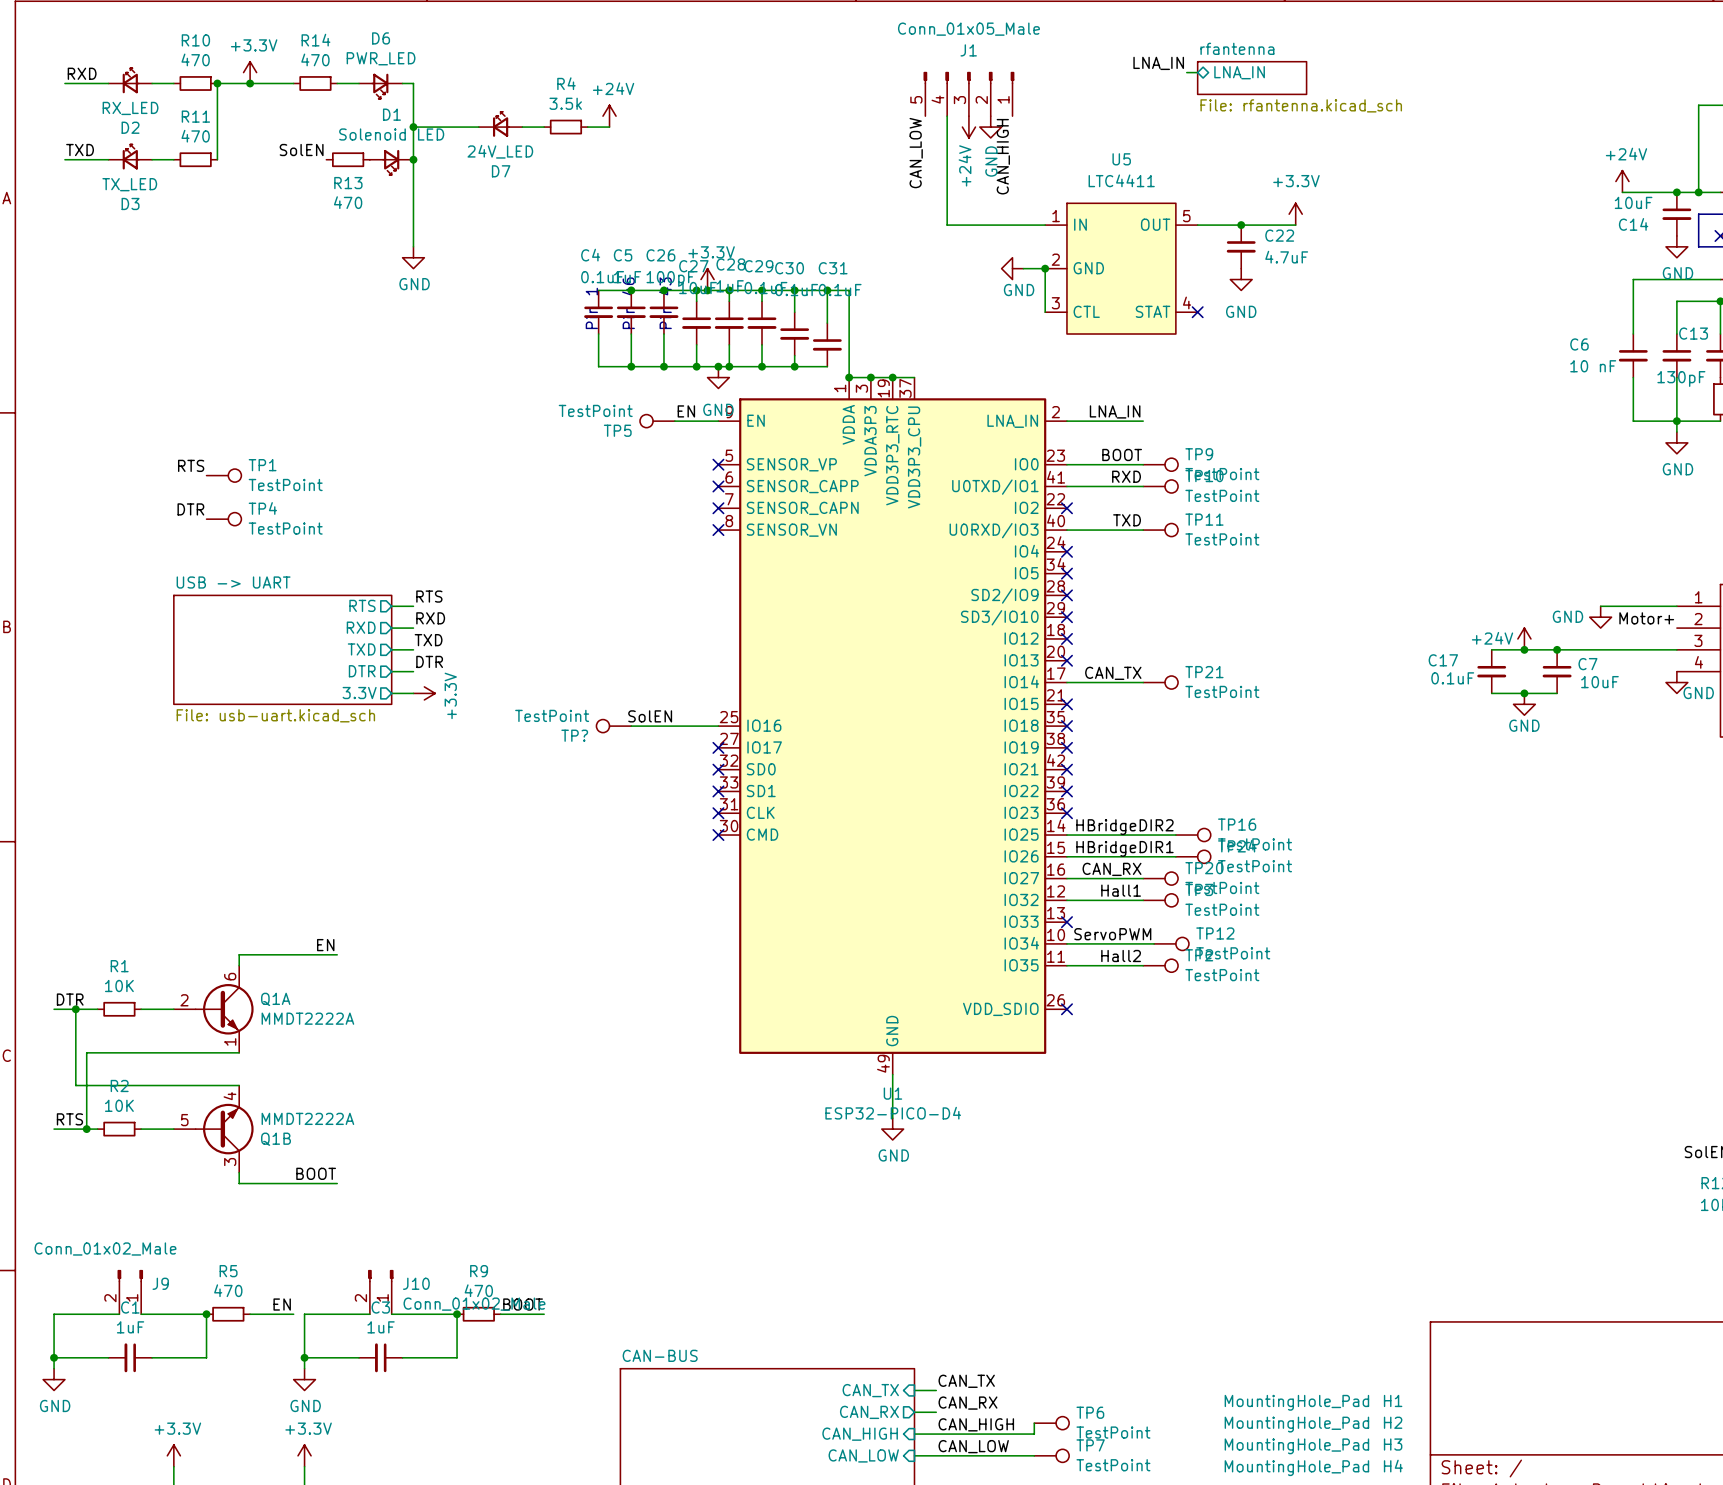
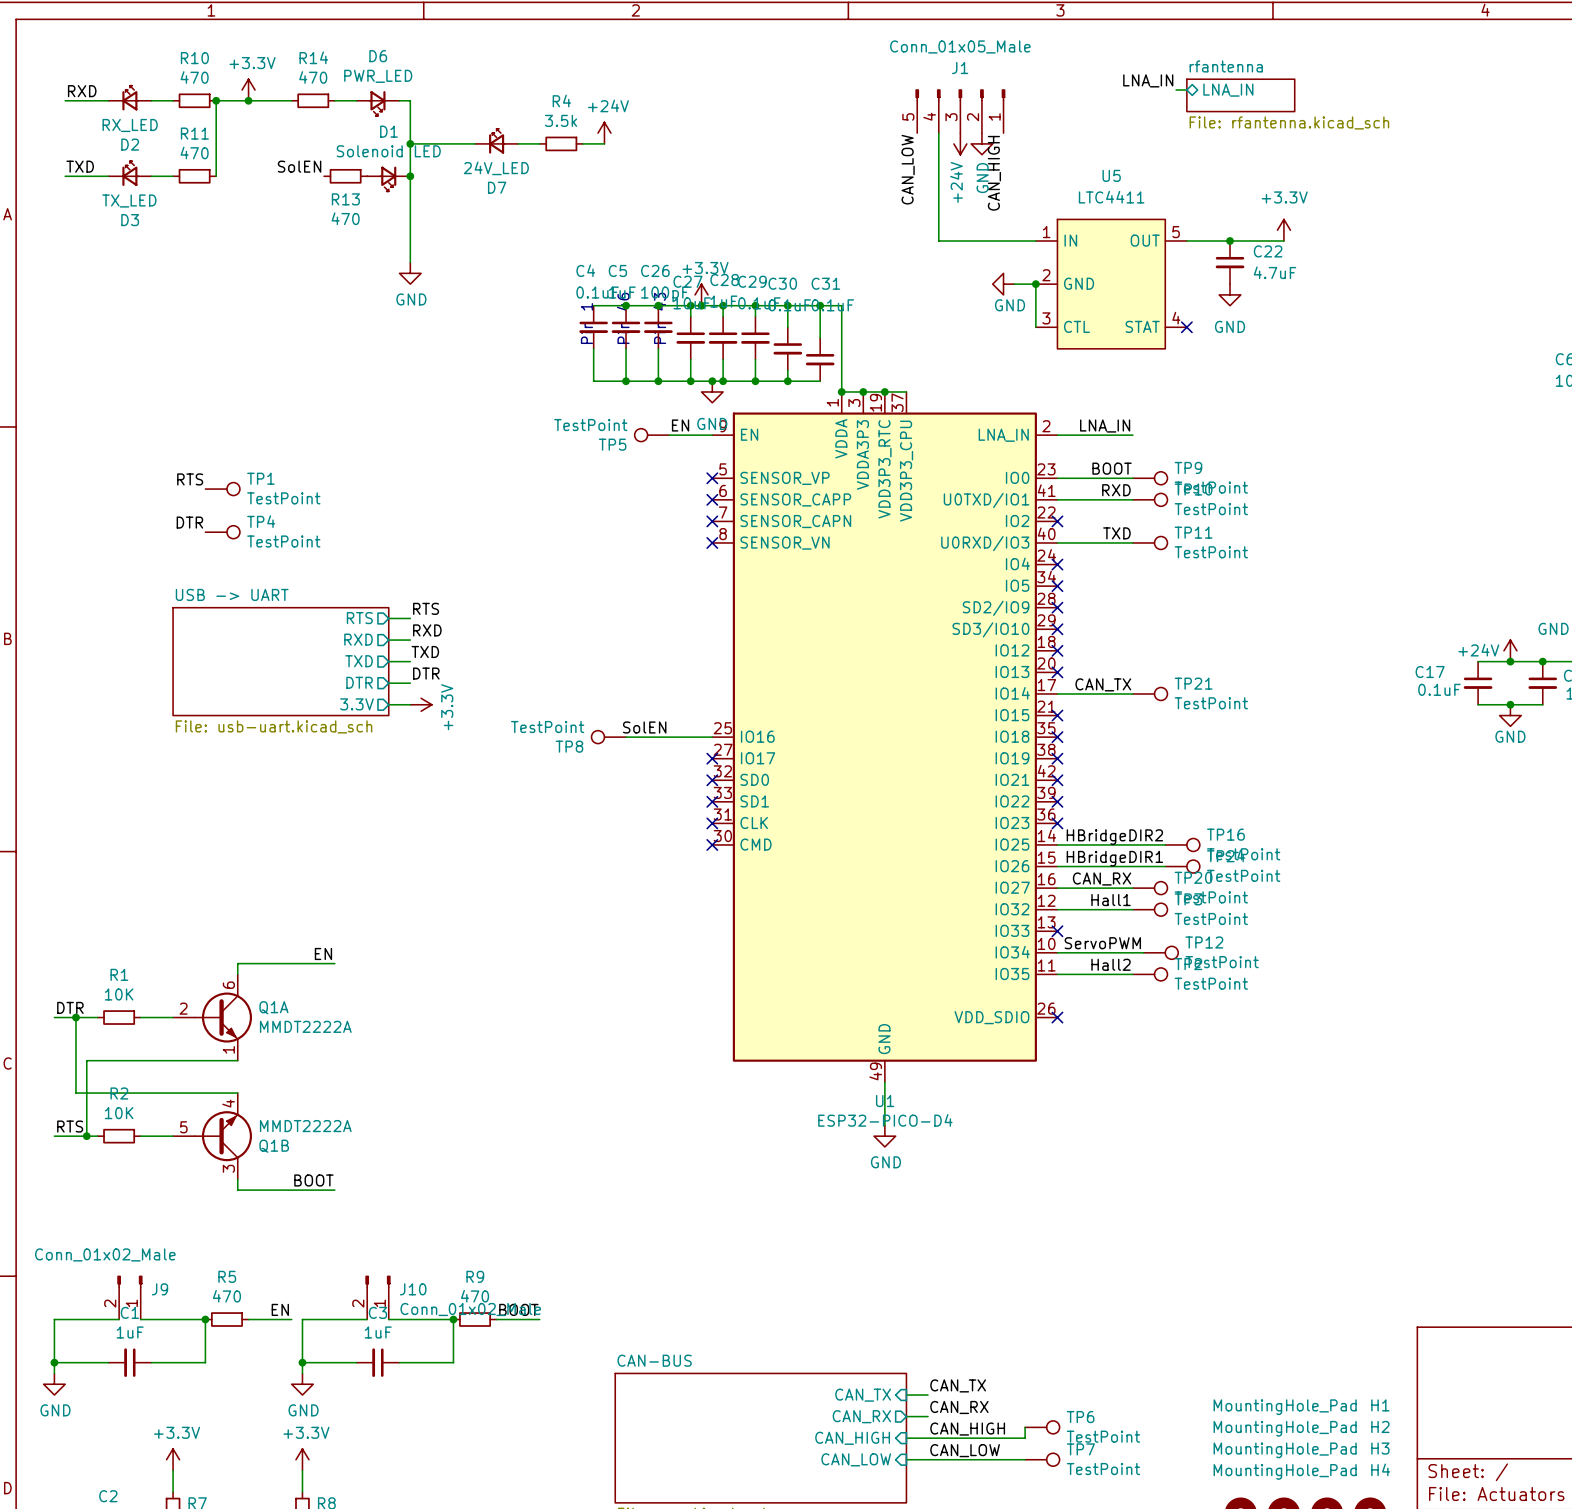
TP? name: TP? (574, 735) -> TP8 (569, 746)

